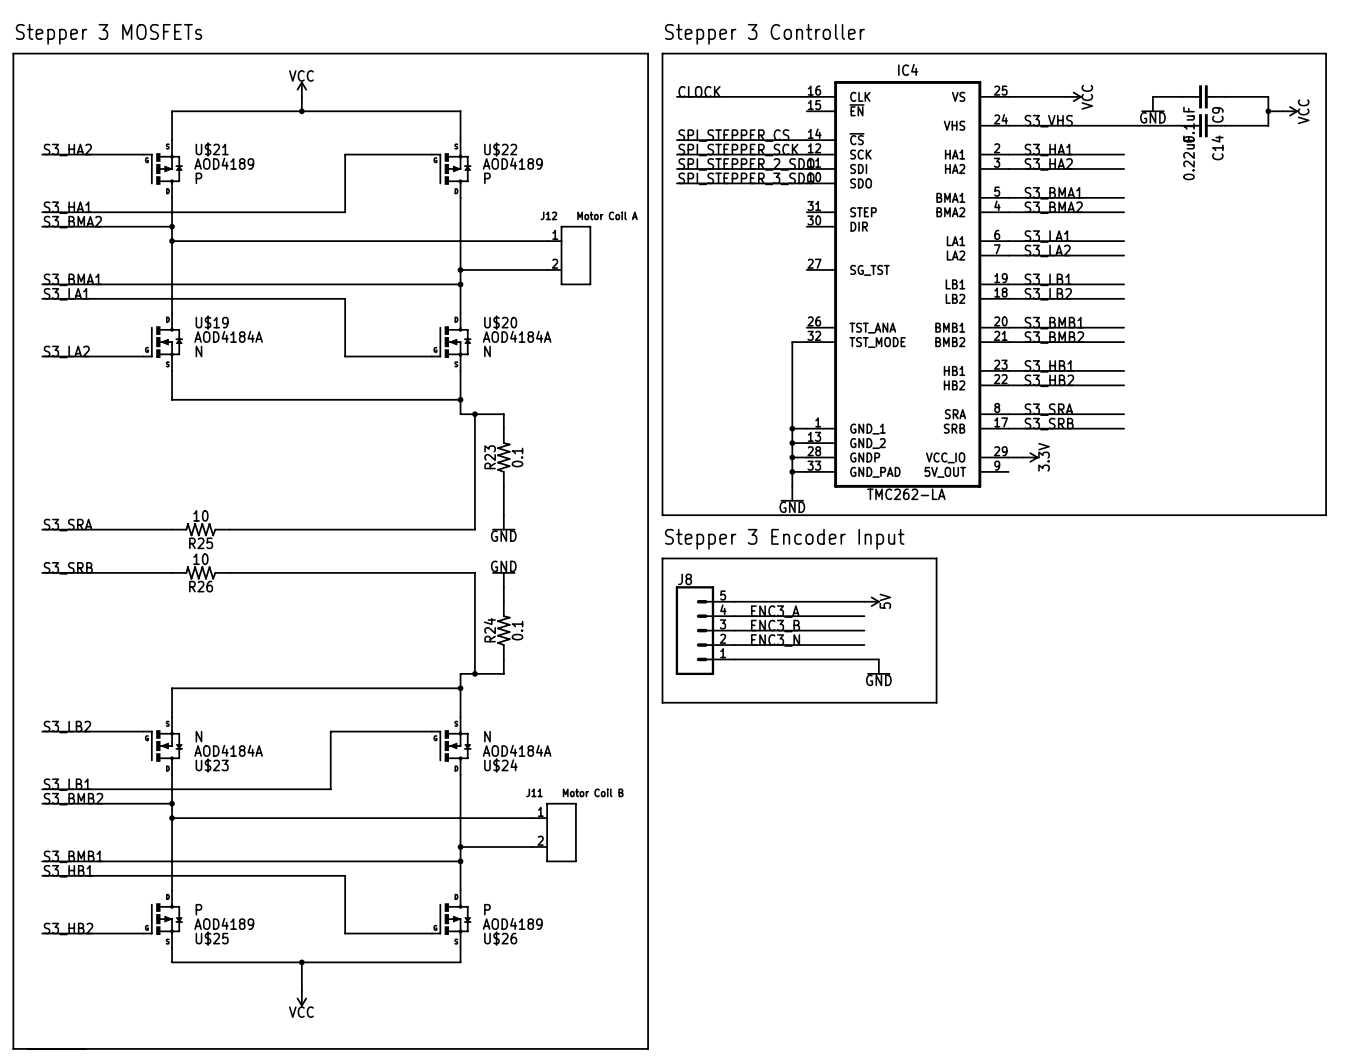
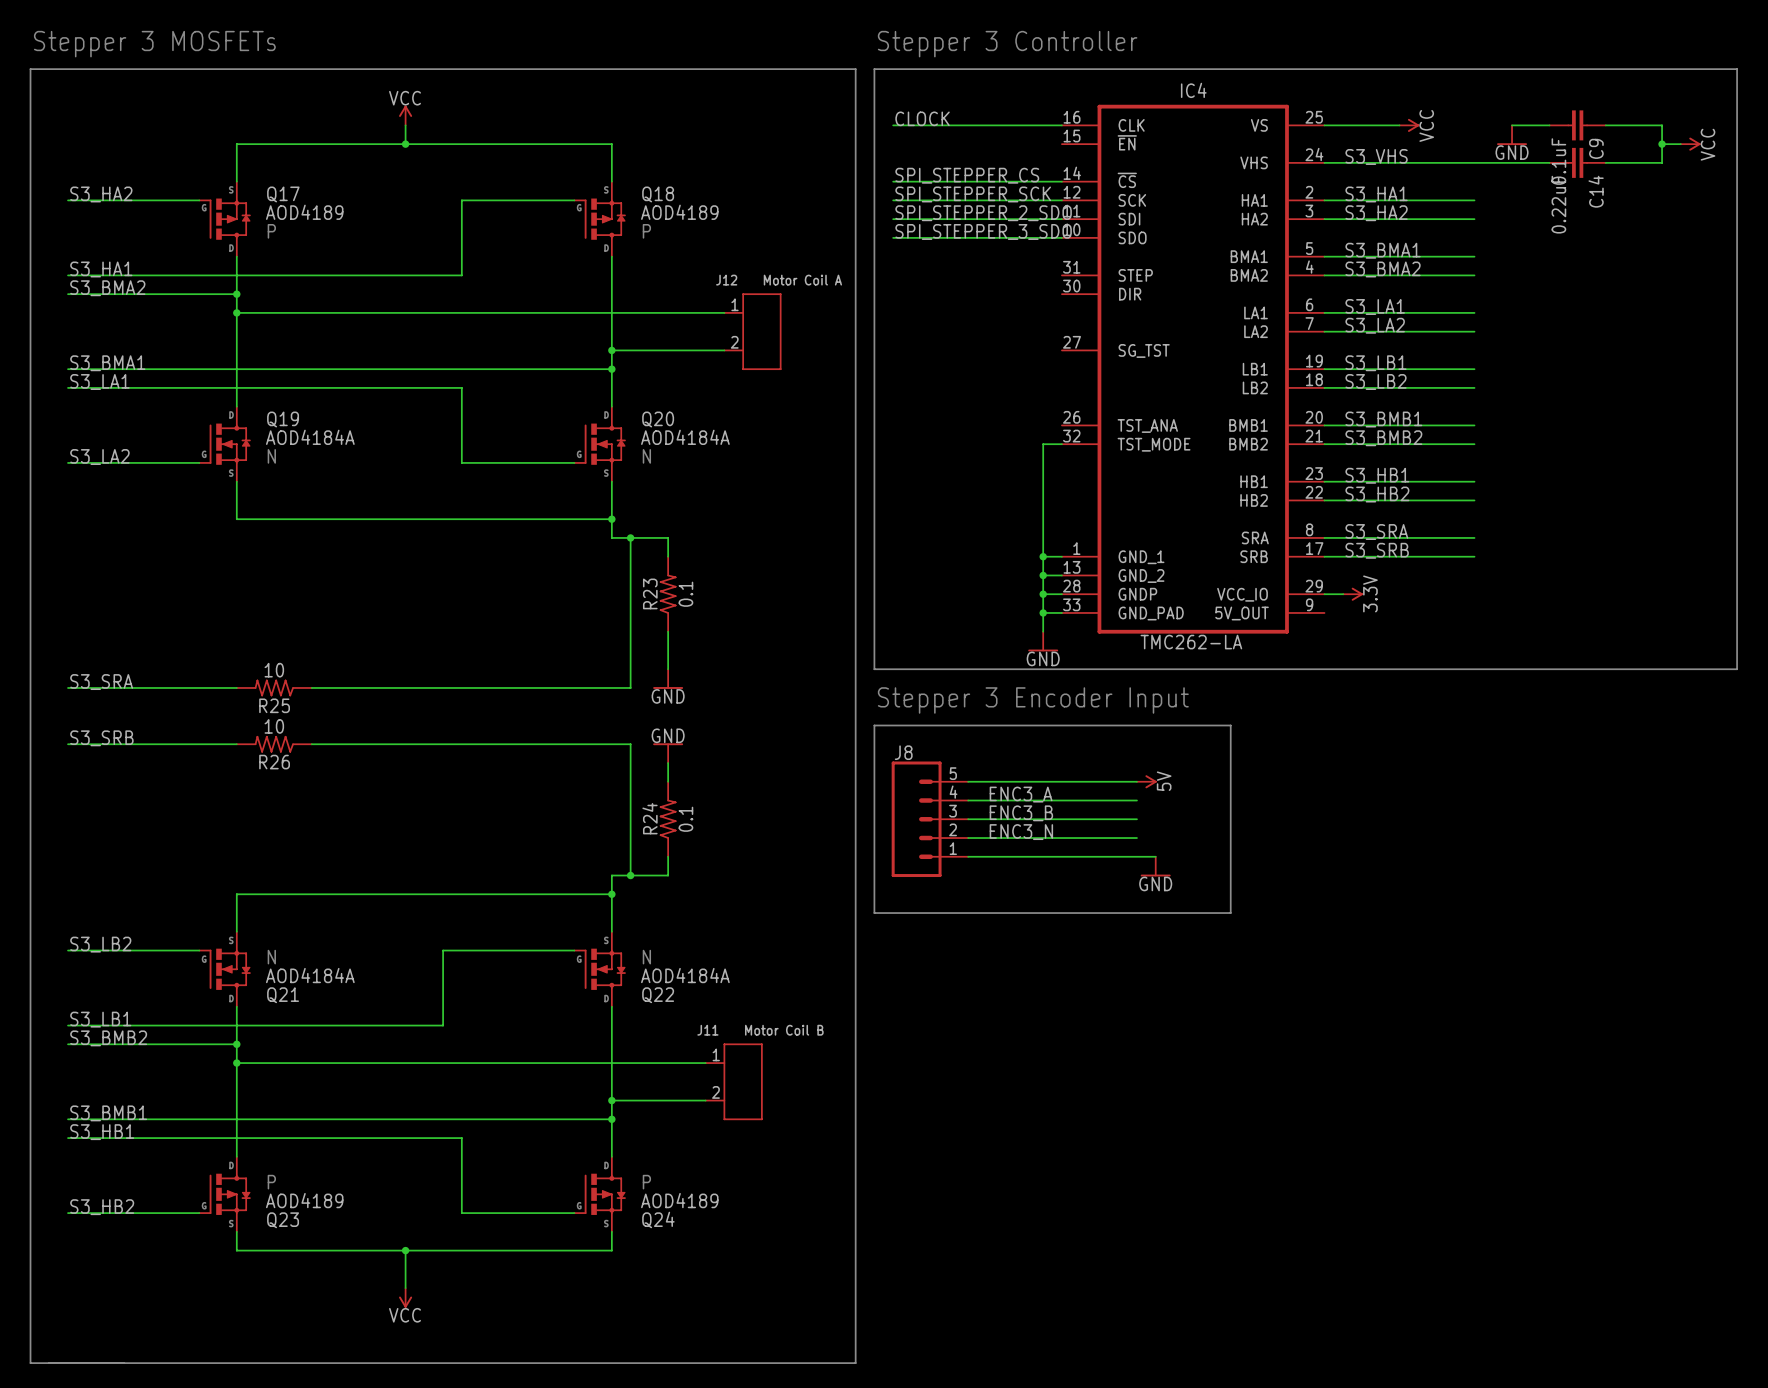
U$21 name: U$21 (212, 149) -> Q17 (283, 194)
U$22 name: U$22 (500, 149) -> Q18 (658, 194)
U$19 name: U$19 (212, 322) -> Q19 (283, 419)
U$20 name: U$20 (500, 322) -> Q20 (658, 419)
U$23 name: U$23 (212, 765) -> Q21 (283, 995)
U$24 name: U$24 (500, 765) -> Q22 (658, 995)
U$25 name: U$25 (212, 938) -> Q23 (283, 1220)
U$26 name: U$26 (500, 938) -> Q24 (658, 1219)

